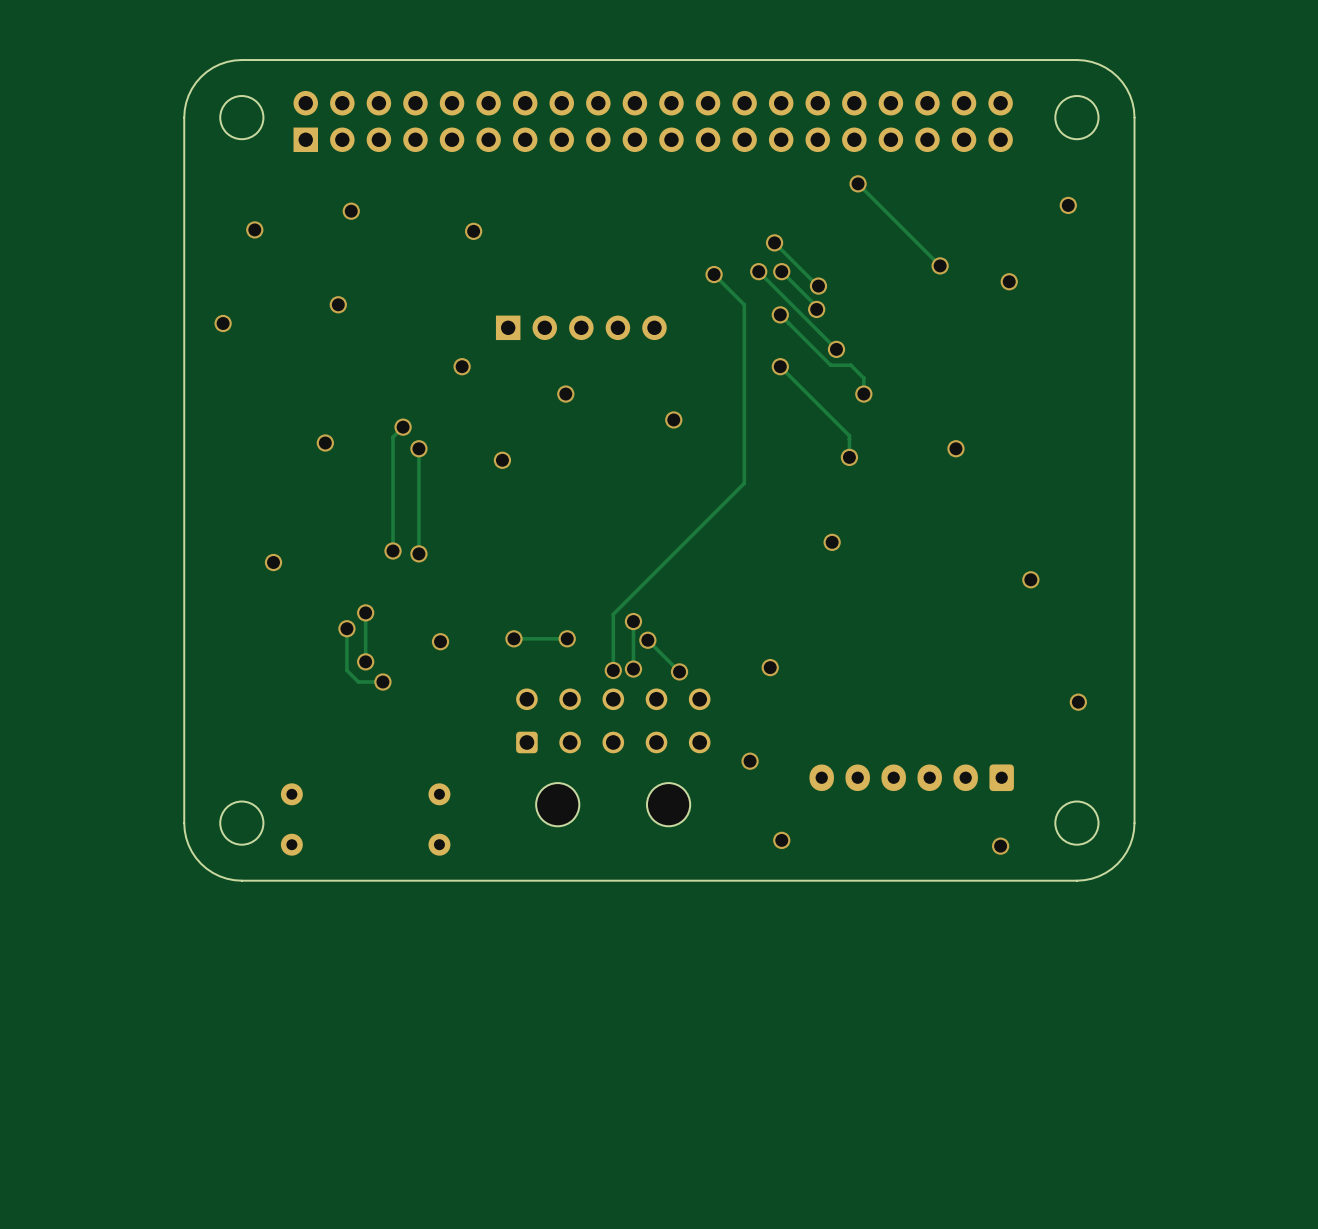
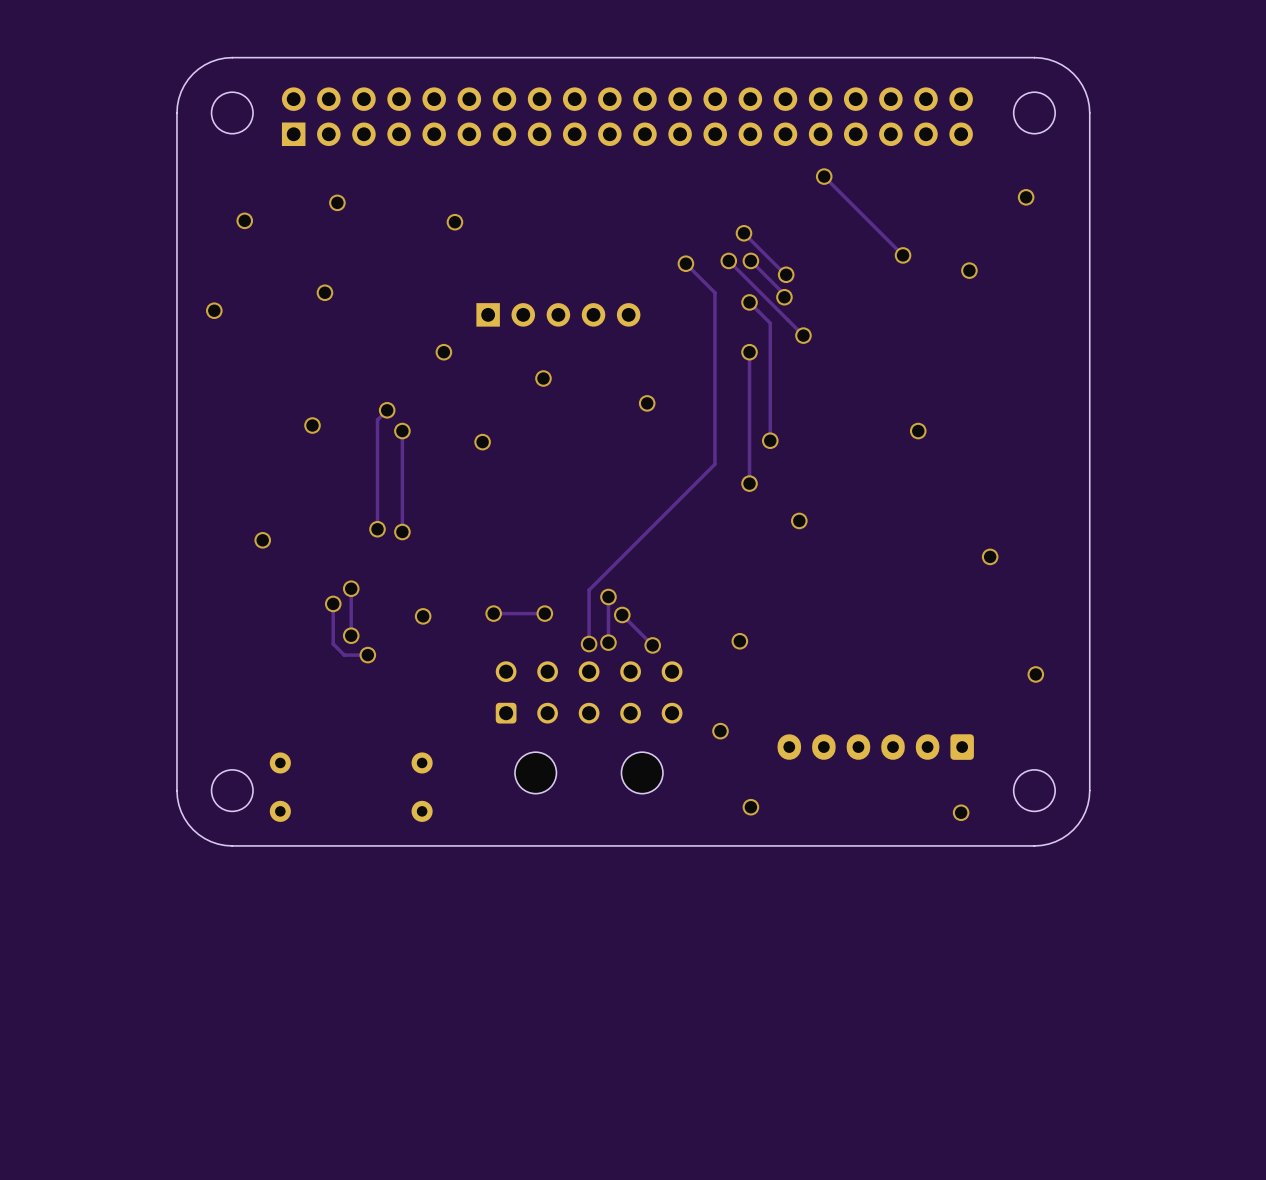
track: (801, 336) (830, 365) (850, 365) (863, 378) (863, 394) -> (770, 323) (770, 440)
track: (780, 366) (849, 435) (849, 457) -> (749, 352) (749, 483)
via: (863, 394) -> none
via: (849, 457) -> none
via: none -> (770, 440)
via: none -> (749, 483)

